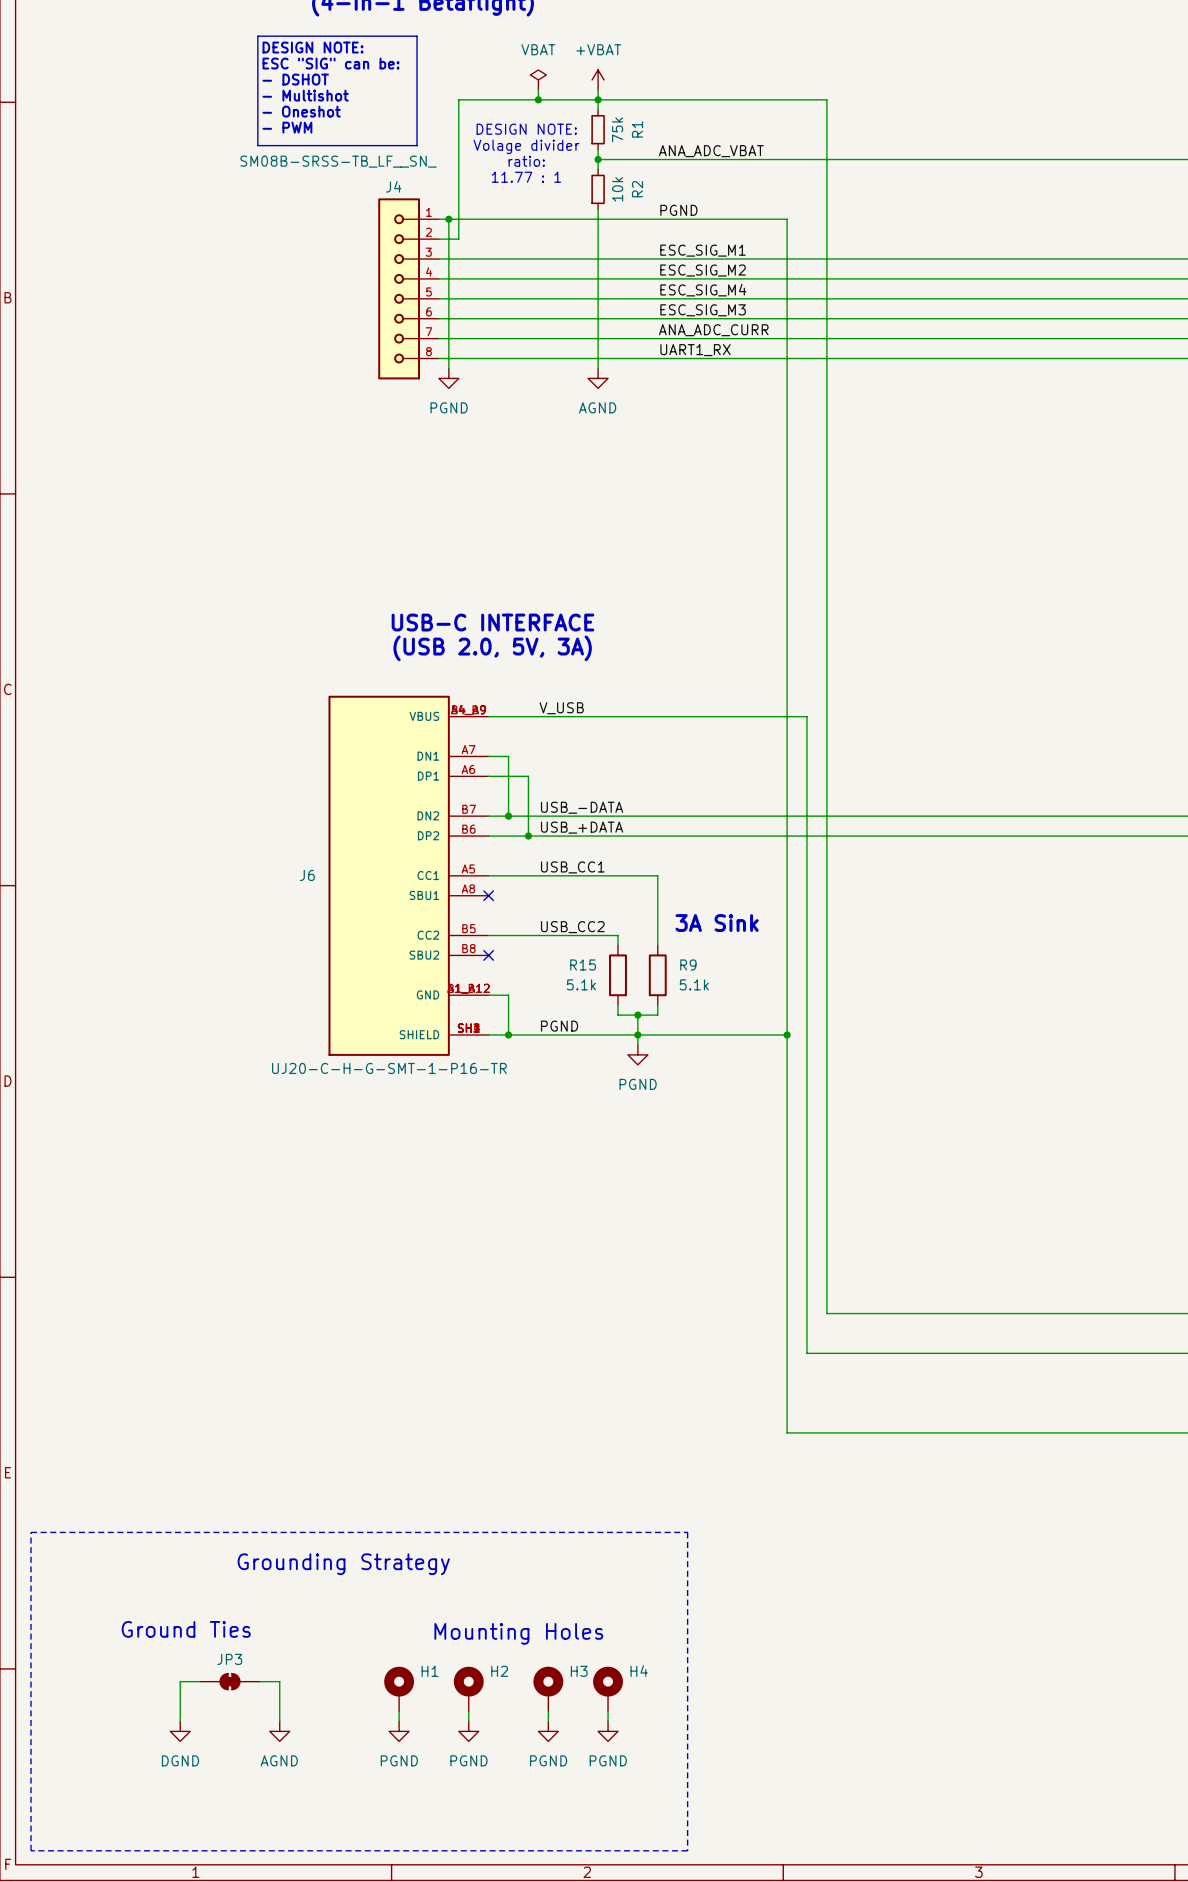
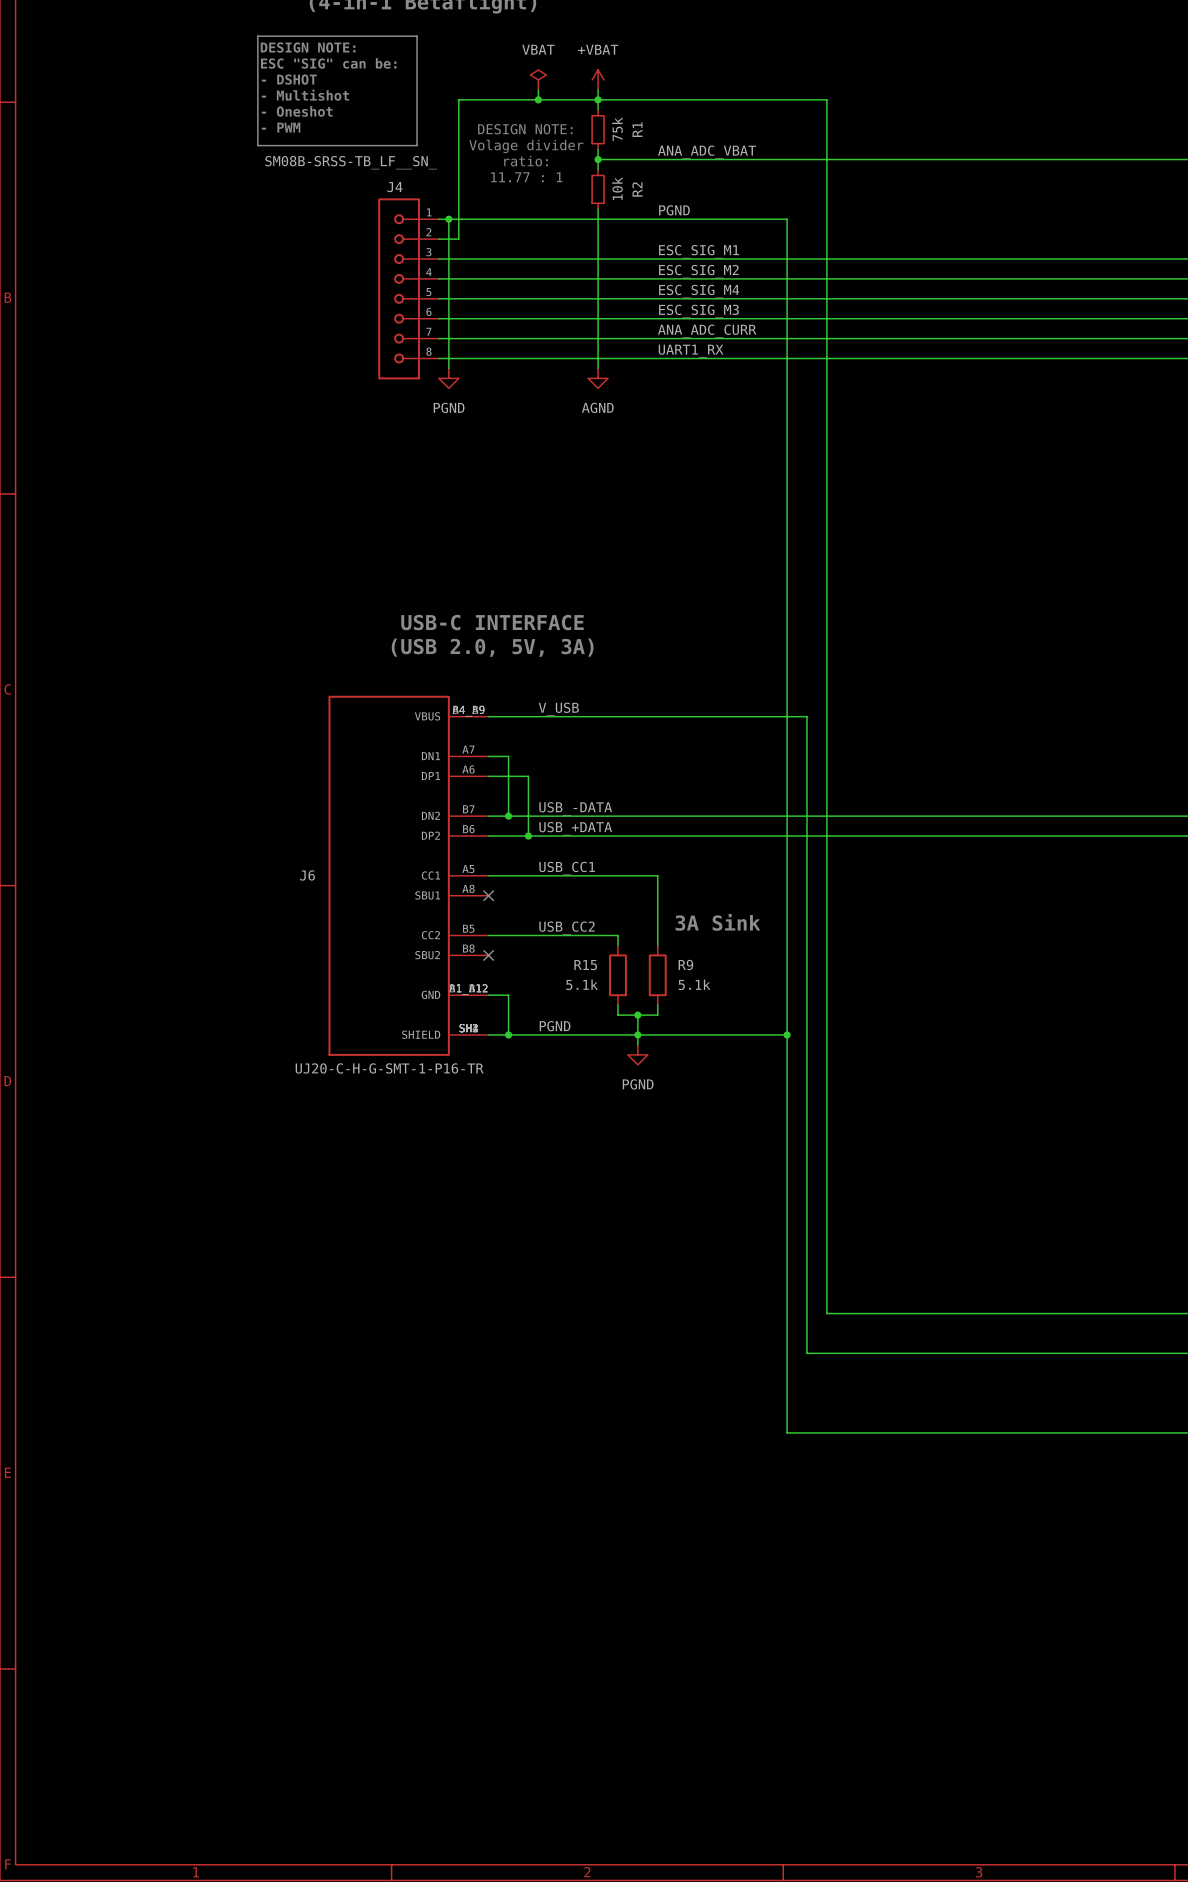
line: (31, 1532) (687, 1532) (687, 1850) (31, 1850) (31, 1532) -> none
text: Grounding Strategy (343, 1564) -> none
text: Ground Ties (186, 1629) -> none
text: Mounting Holes (518, 1633) -> none
wire: (200, 1681) (180, 1681) (180, 1721) -> none
JP3: (229, 1681) -> none
wire: (259, 1681) (279, 1681) (279, 1721) -> none
H1: (399, 1689) -> none
H2: (468, 1689) -> none
H3: (548, 1689) -> none
H4: (608, 1689) -> none
wire: (399, 1711) (399, 1721) -> none
wire: (468, 1711) (468, 1721) -> none
wire: (548, 1711) (548, 1721) -> none
wire: (608, 1711) (608, 1721) -> none
power symbol: DGND (180, 1731) -> none
power symbol: AGND (279, 1731) -> none
power symbol: PGND (399, 1731) -> none
power symbol: PGND (468, 1731) -> none
power symbol: PGND (548, 1731) -> none
power symbol: PGND (608, 1731) -> none

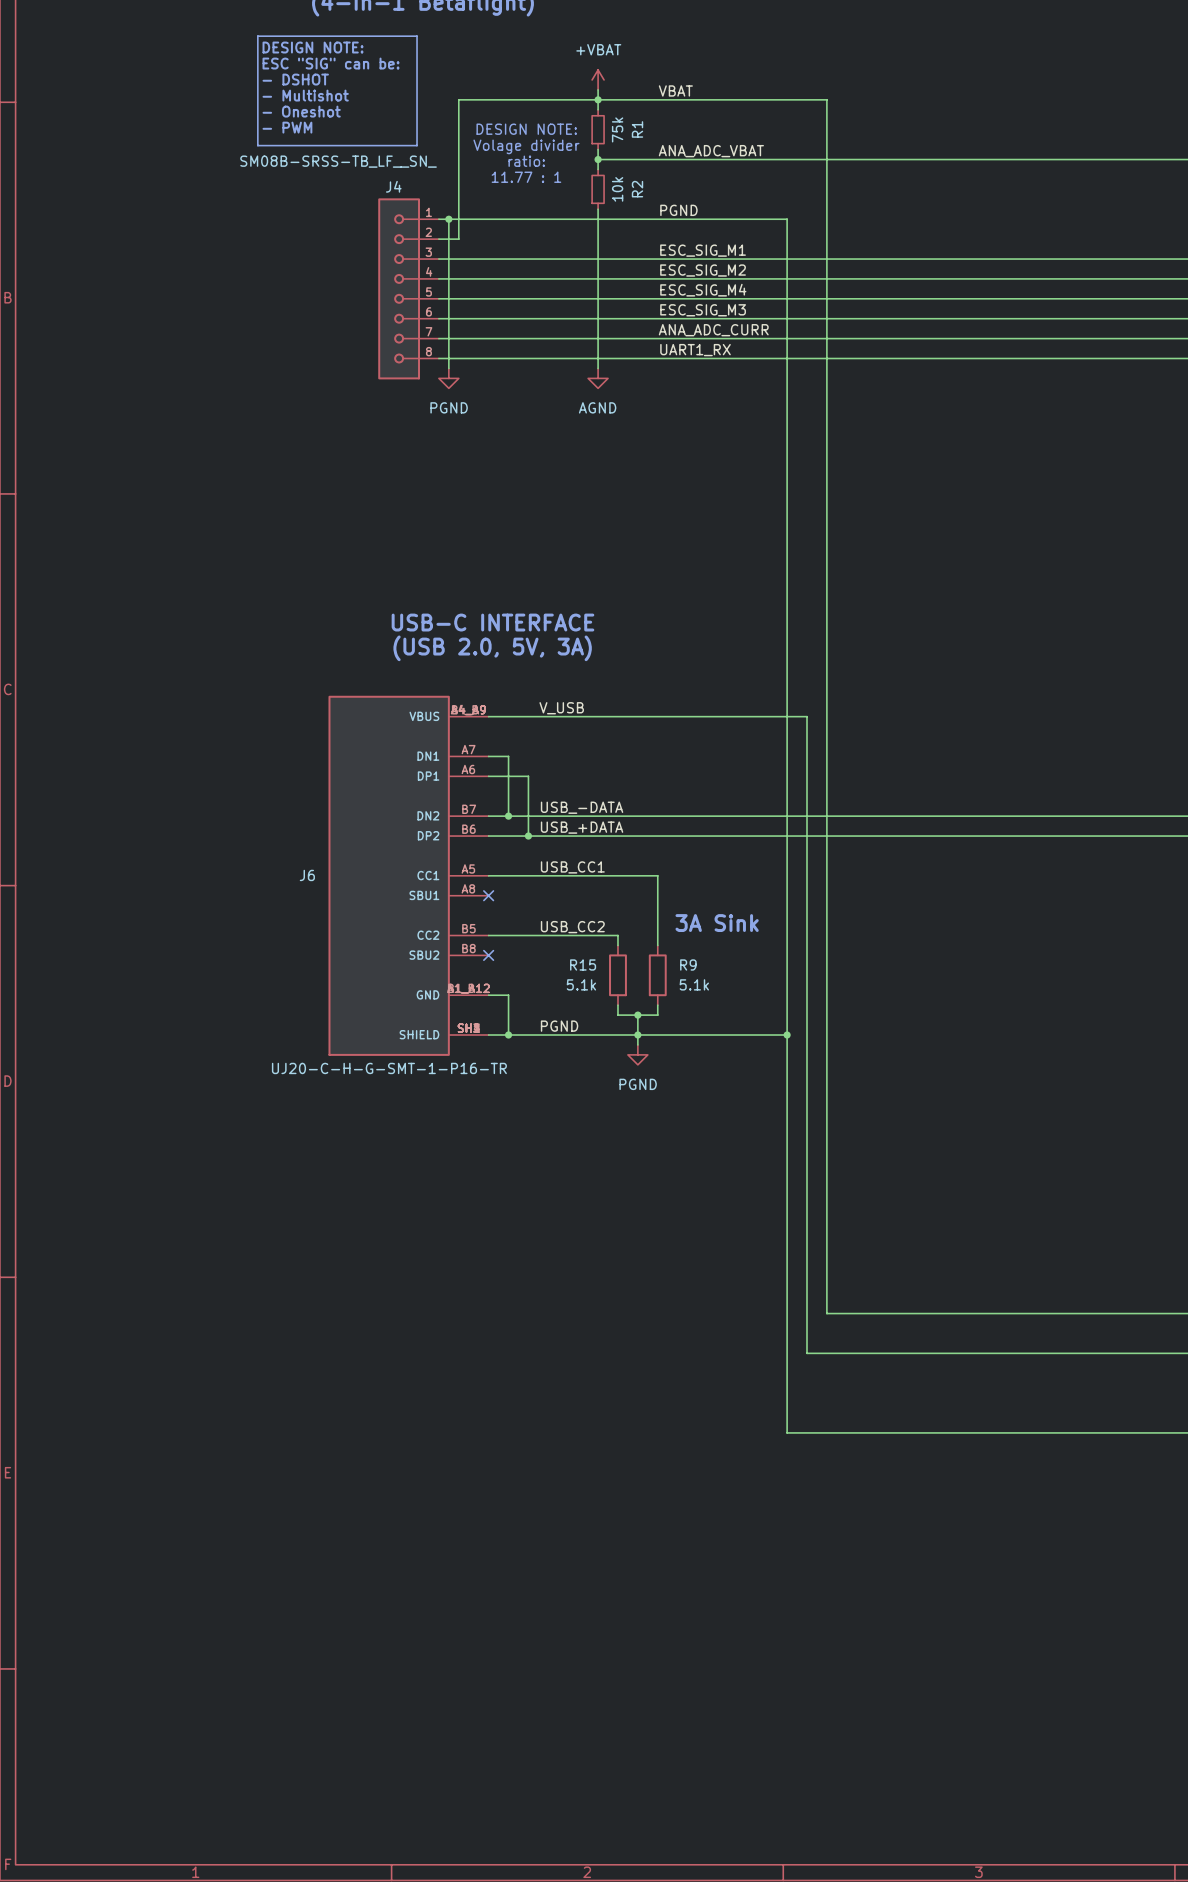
power symbol: VBAT (538, 79) -> none
wire: (538, 89) (538, 99) -> none
label: none -> VBAT (675, 90)
junction: (538, 99) -> none

